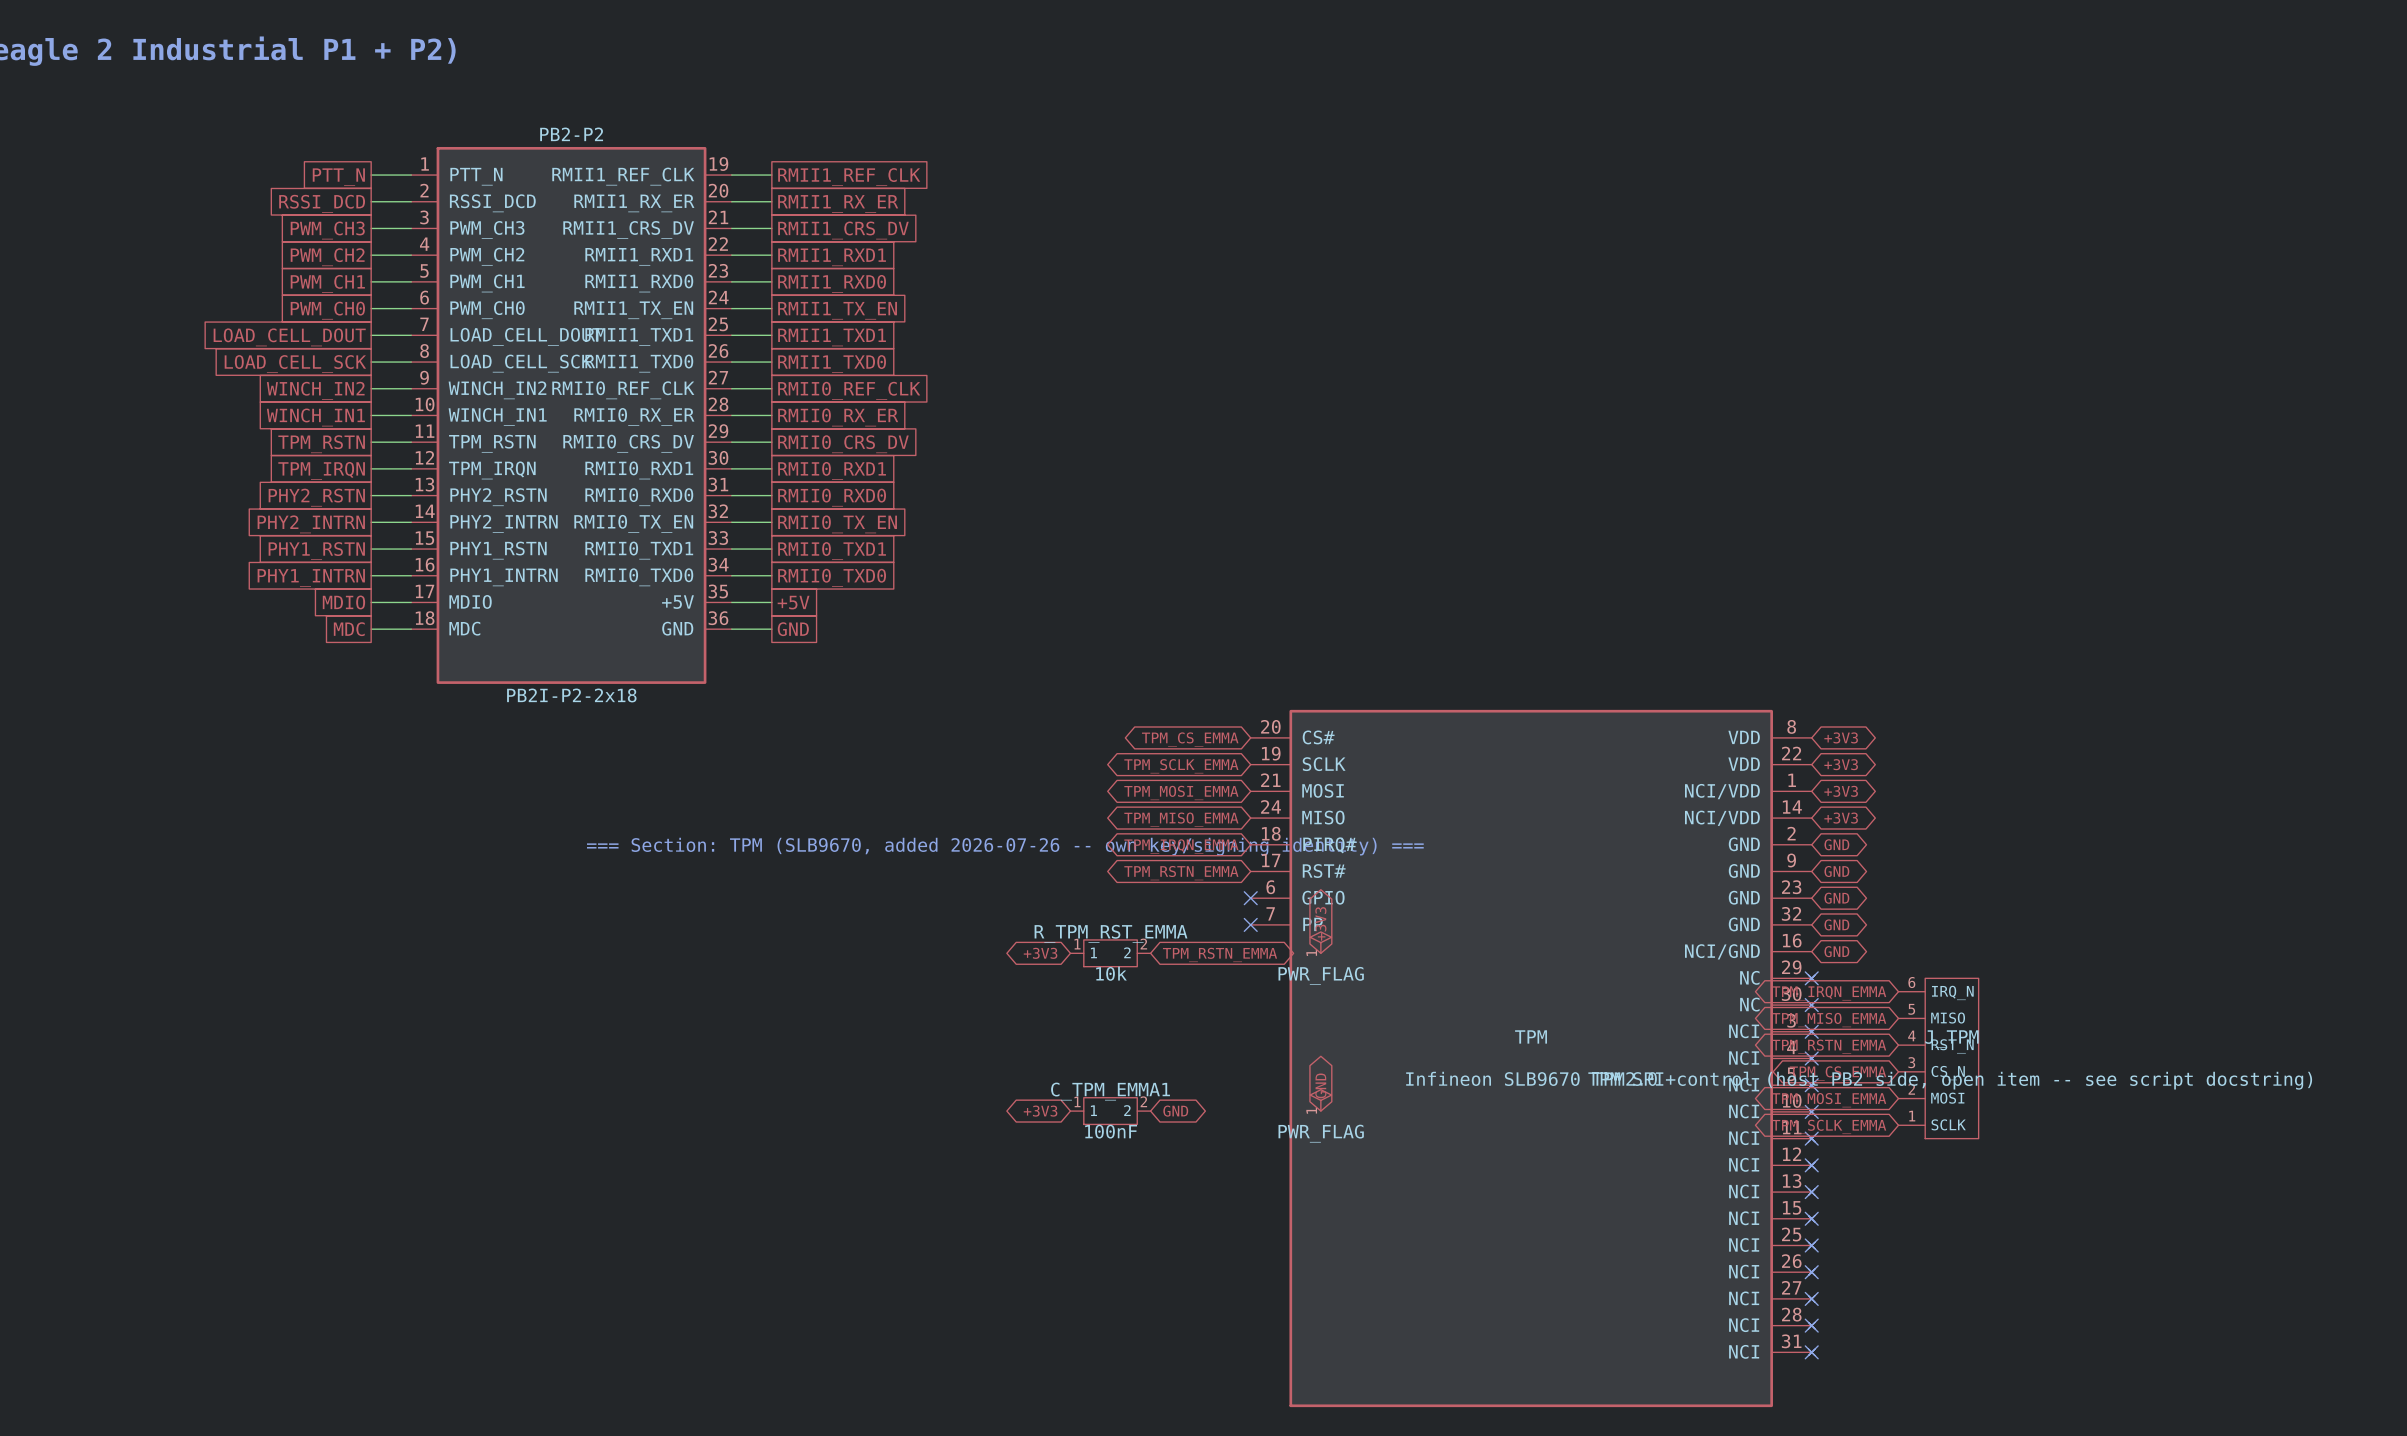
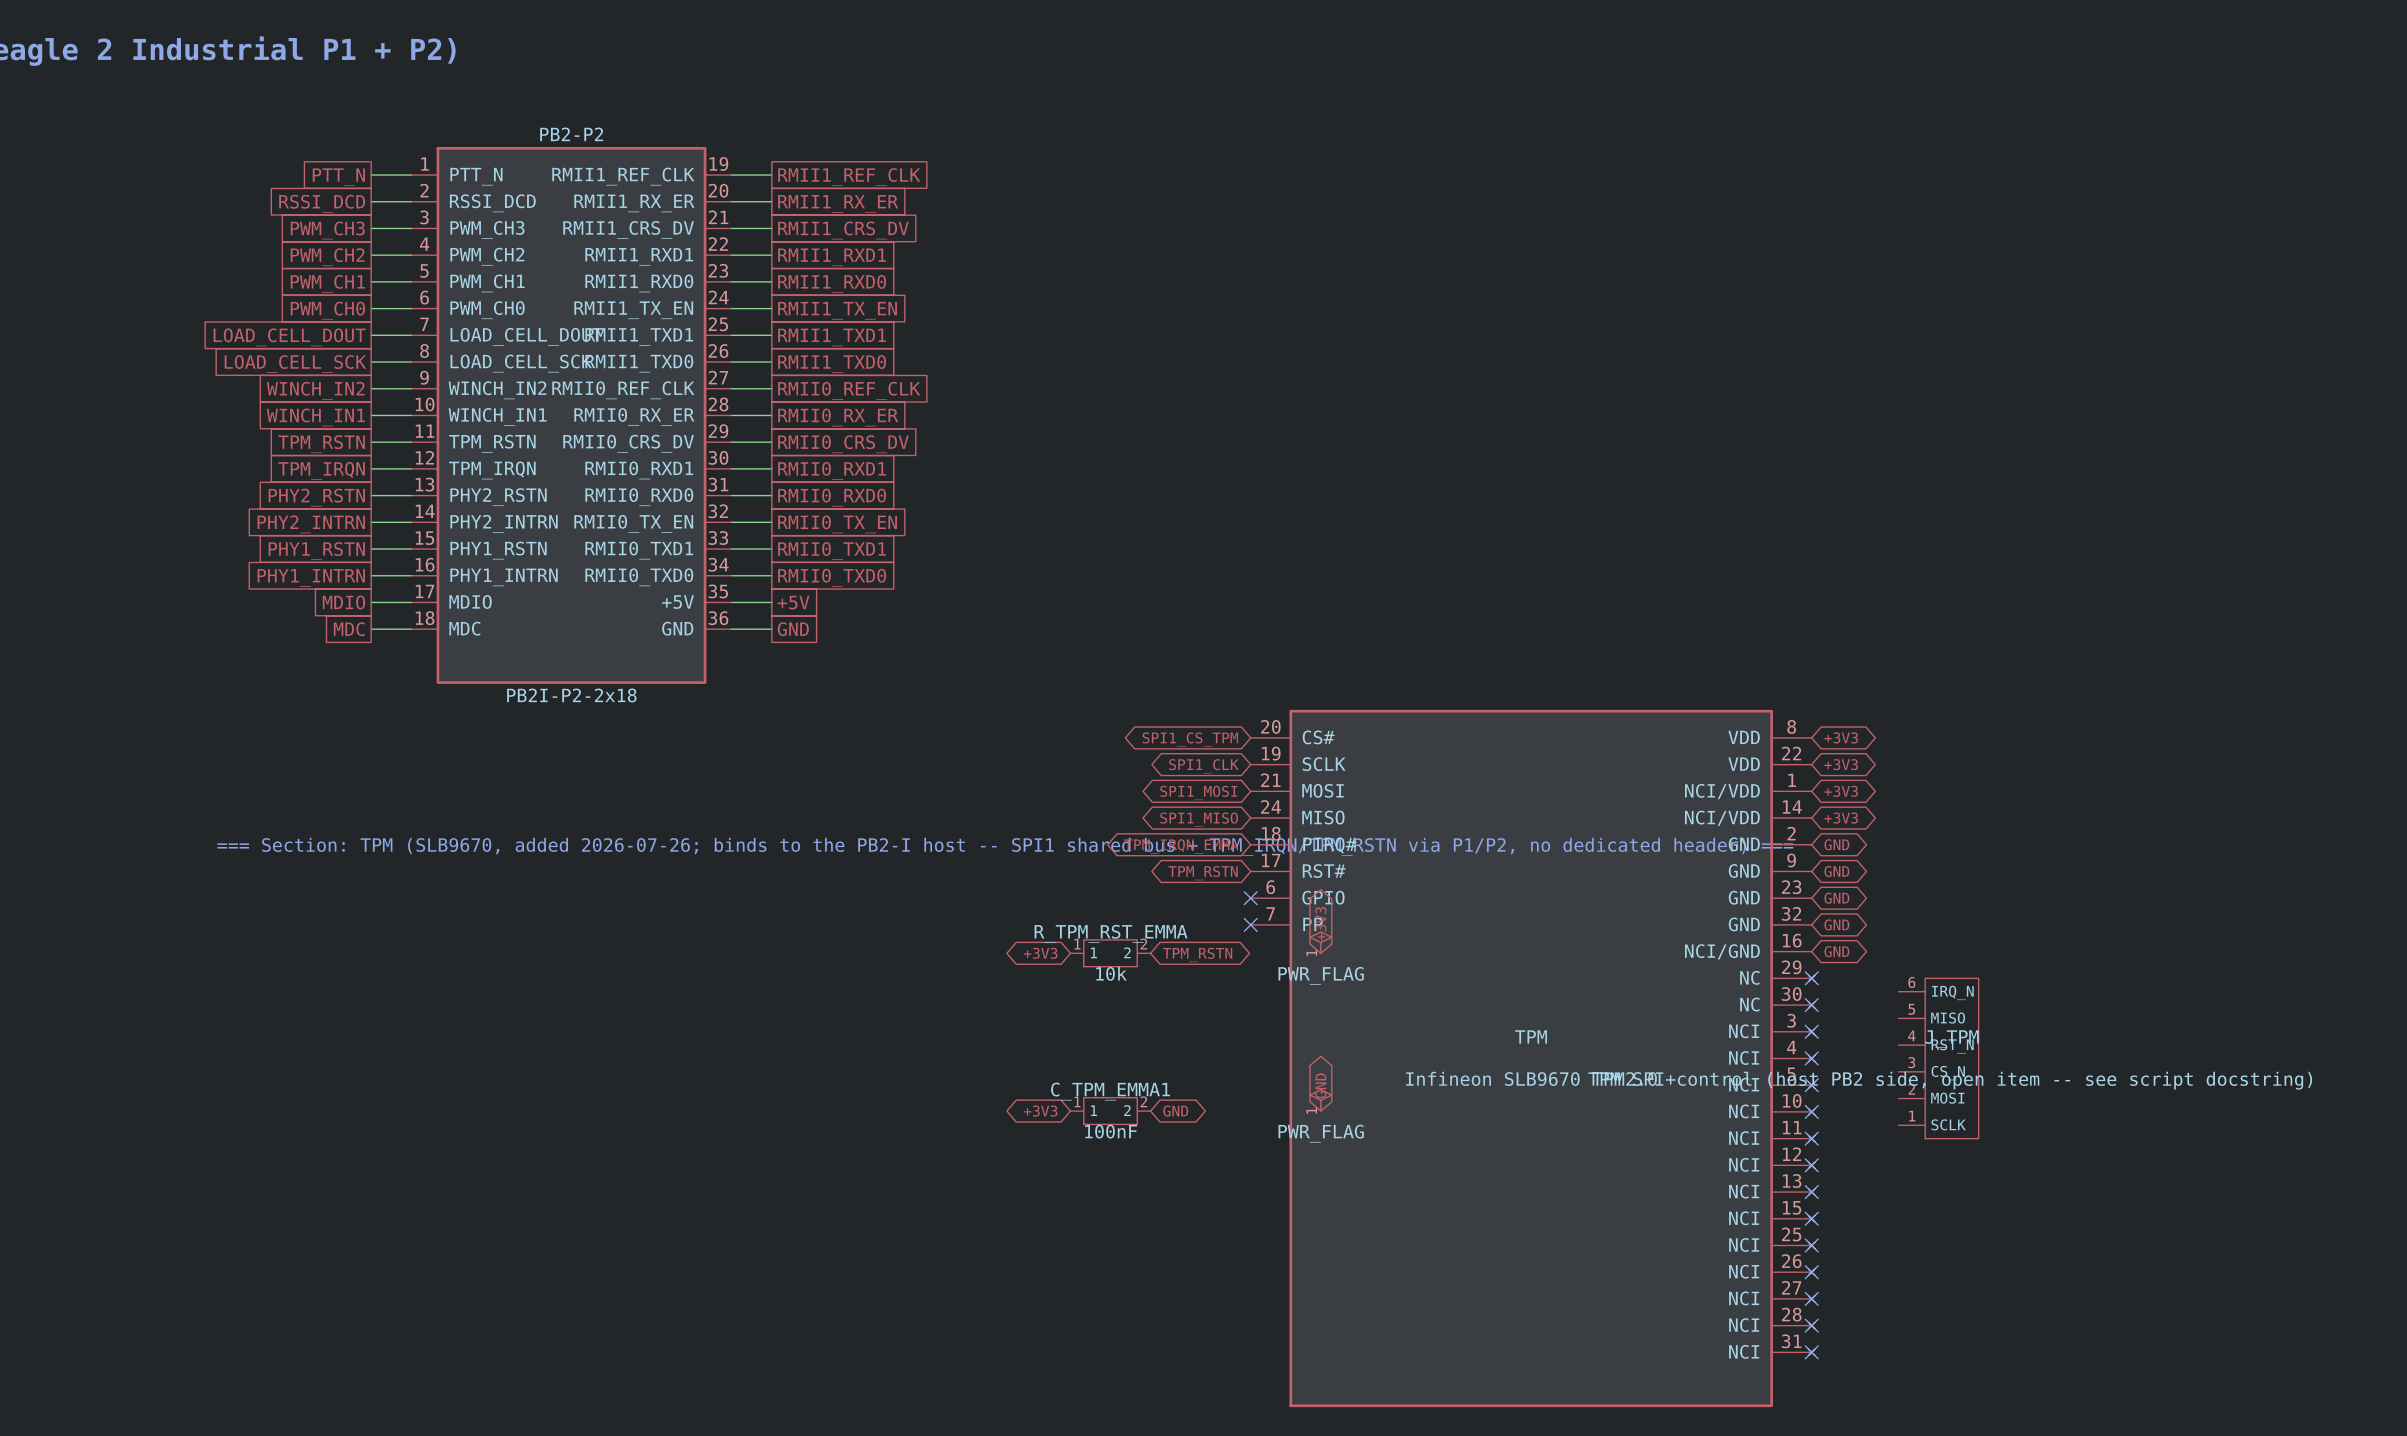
global label: TPM_CS_EMMA (1190, 739) -> SPI1_CS_TPM (1190, 739)
global label: TPM_SCLK_EMMA (1181, 766) -> SPI1_CLK (1203, 766)
global label: TPM_MOSI_EMMA (1181, 792) -> SPI1_MOSI (1198, 792)
global label: TPM_MISO_EMMA (1181, 819) -> SPI1_MISO (1199, 819)
text: === Section: TPM (SLB9670, added 2026-07-26 -- own key/signing identity) === (1005, 846) -> === Section: TPM (SLB9670, added 2026-07-26; binds to the PB2-I host -- SPI1 shared bus + TPM_IRQN/TPM_RSTN via P1/P2, no dedicated header) === (1005, 846)
global label: TPM_RSTN_EMMA (1181, 873) -> TPM_RSTN (1203, 873)
global label: TPM_RSTN_EMMA (1220, 954) -> TPM_RSTN (1197, 954)
global label: TPM_IRQN_EMMA (1829, 993) -> none
global label: TPM_MISO_EMMA (1829, 1020) -> none
global label: TPM_RSTN_EMMA (1829, 1046) -> none
global label: TPM_CS_EMMA (1837, 1073) -> none
global label: TPM_MOSI_EMMA (1829, 1100) -> none
global label: TPM_SCLK_EMMA (1829, 1126) -> none

